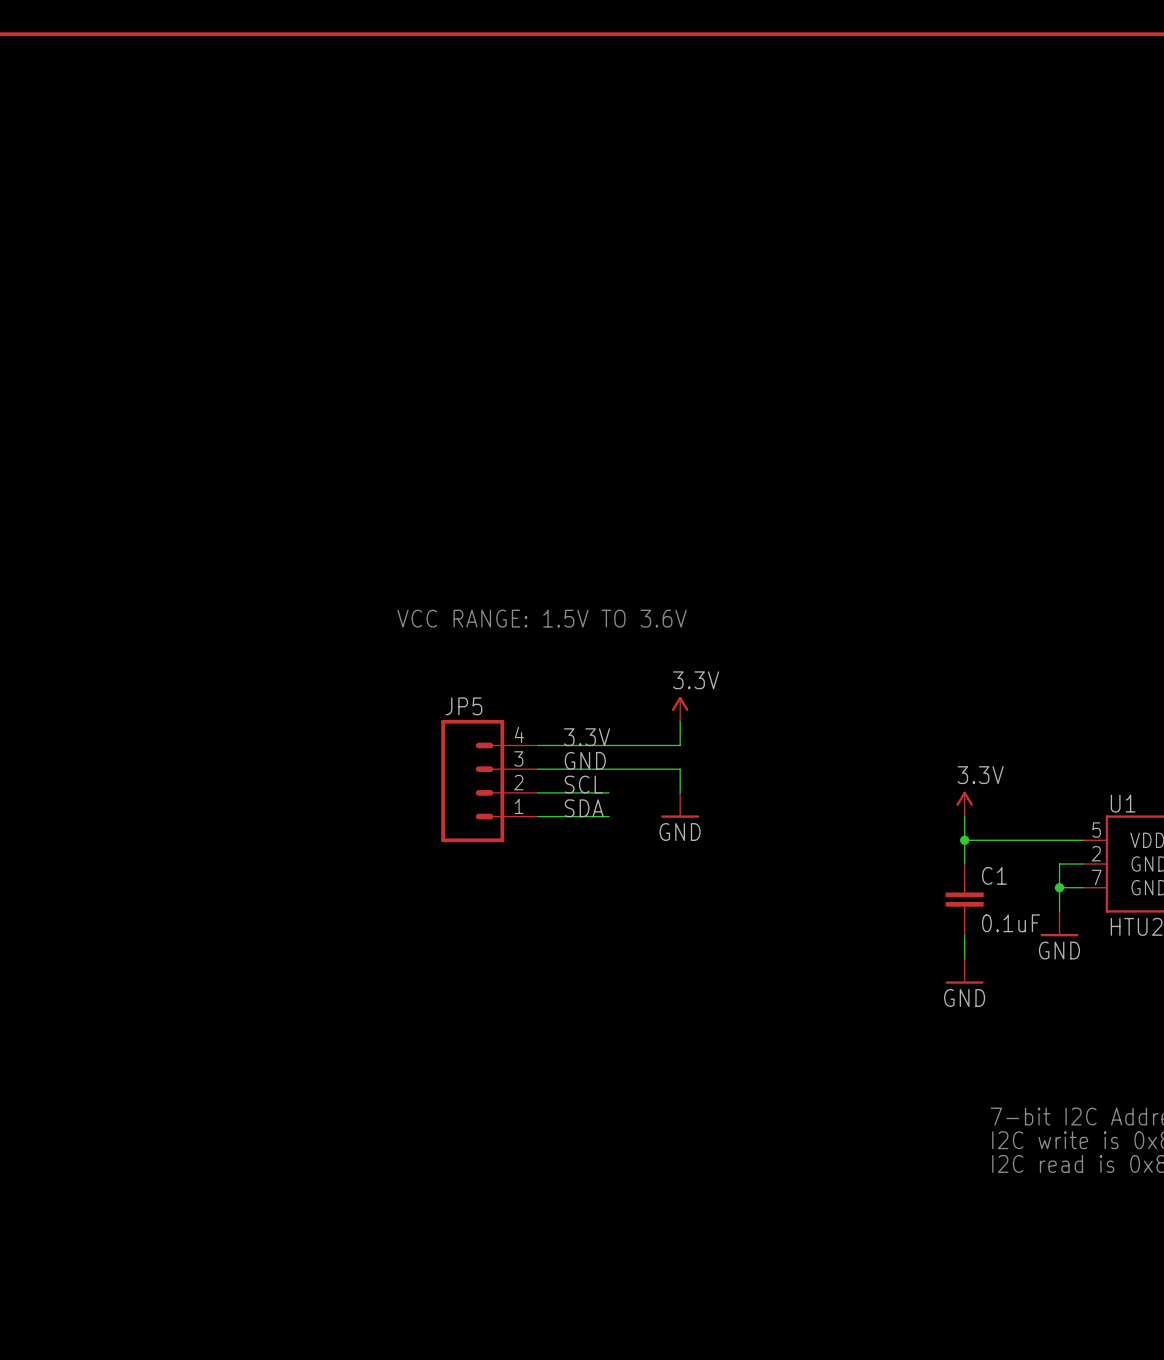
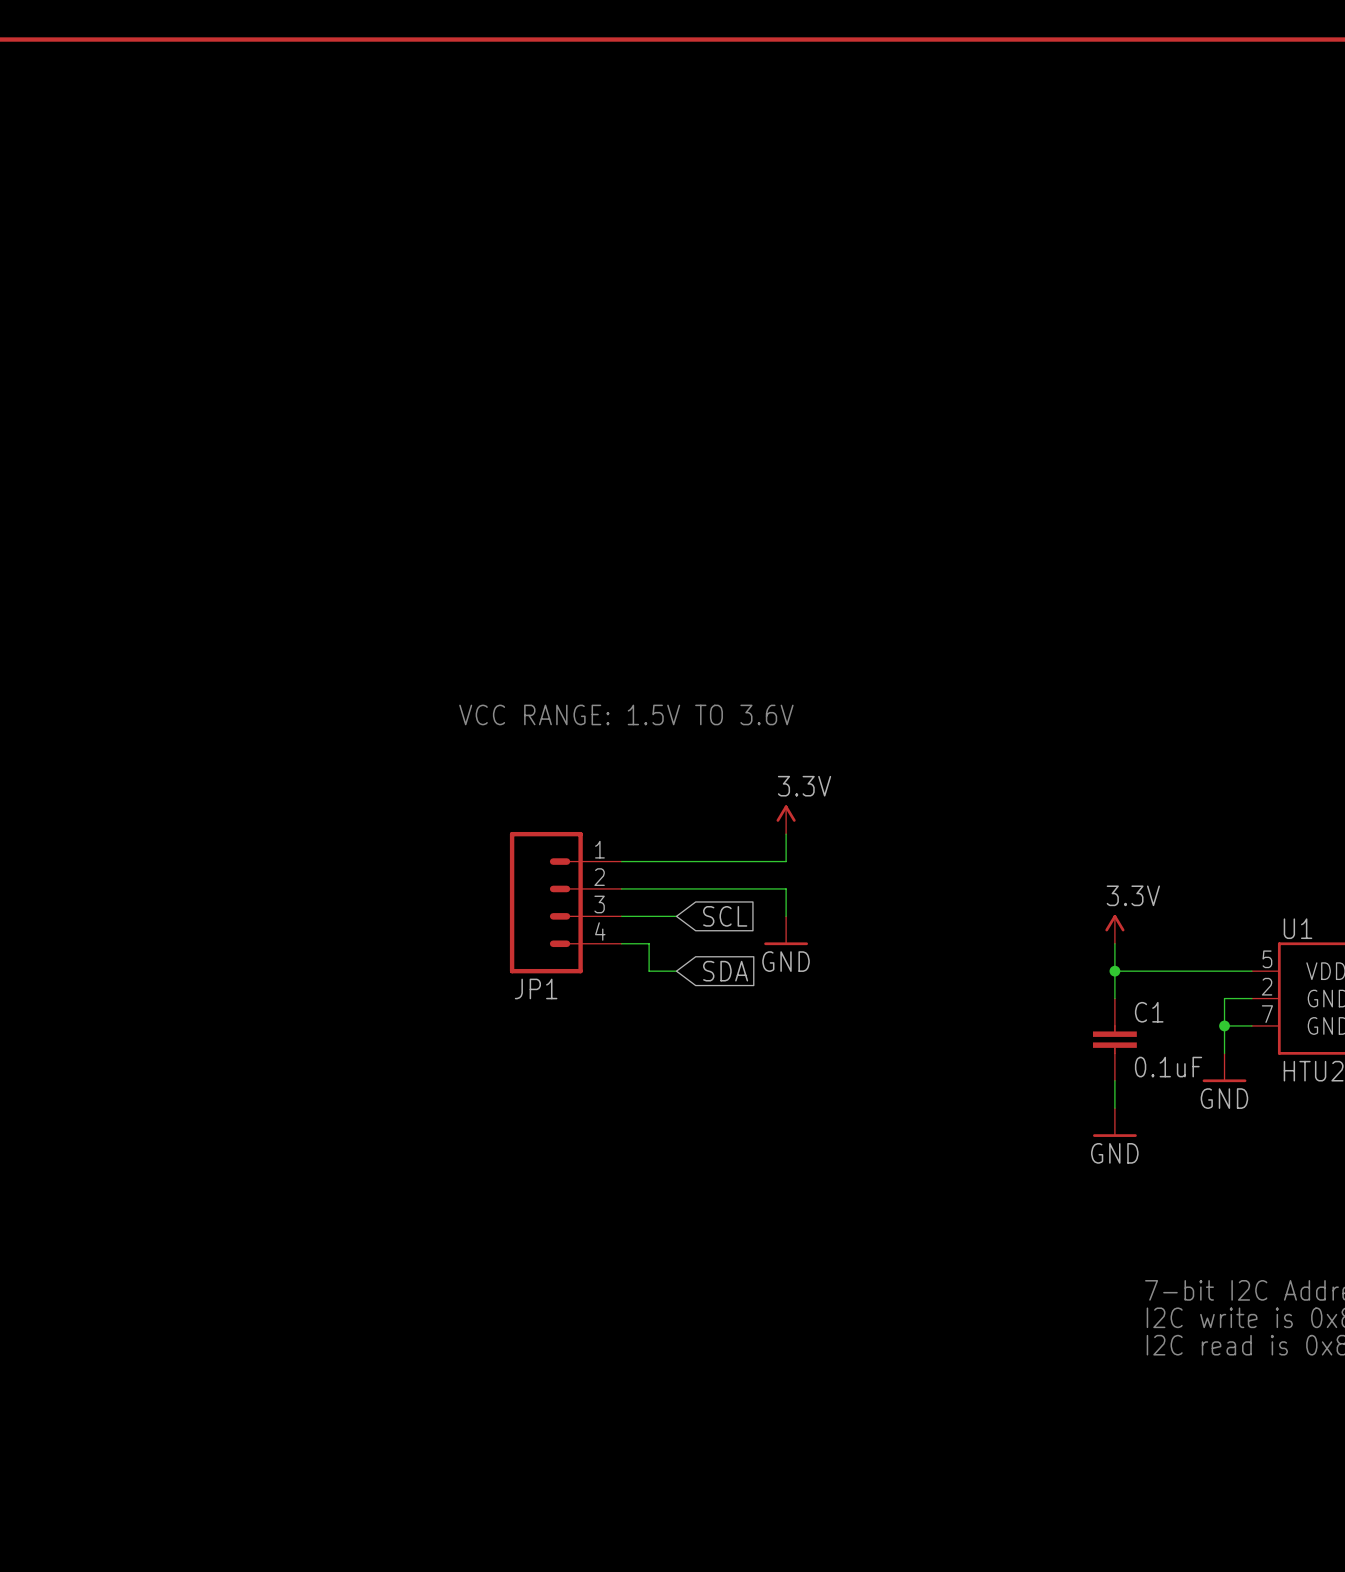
JP5 name: JP5 (463, 706) -> JP1 (536, 988)
label: 3.3V (587, 737) -> none
label: GND (585, 760) -> none
JP5 flip: as is (472, 781) -> up-down (546, 902)
label: SCL (583, 784) -> none
wire: (585, 792) (609, 792) -> none
global label: none -> SCL (725, 916)
label: SDA (584, 808) -> none
wire: (561, 816) (609, 816) -> (649, 943) (649, 971) (676, 971)
global label: none -> SDA (725, 971)

